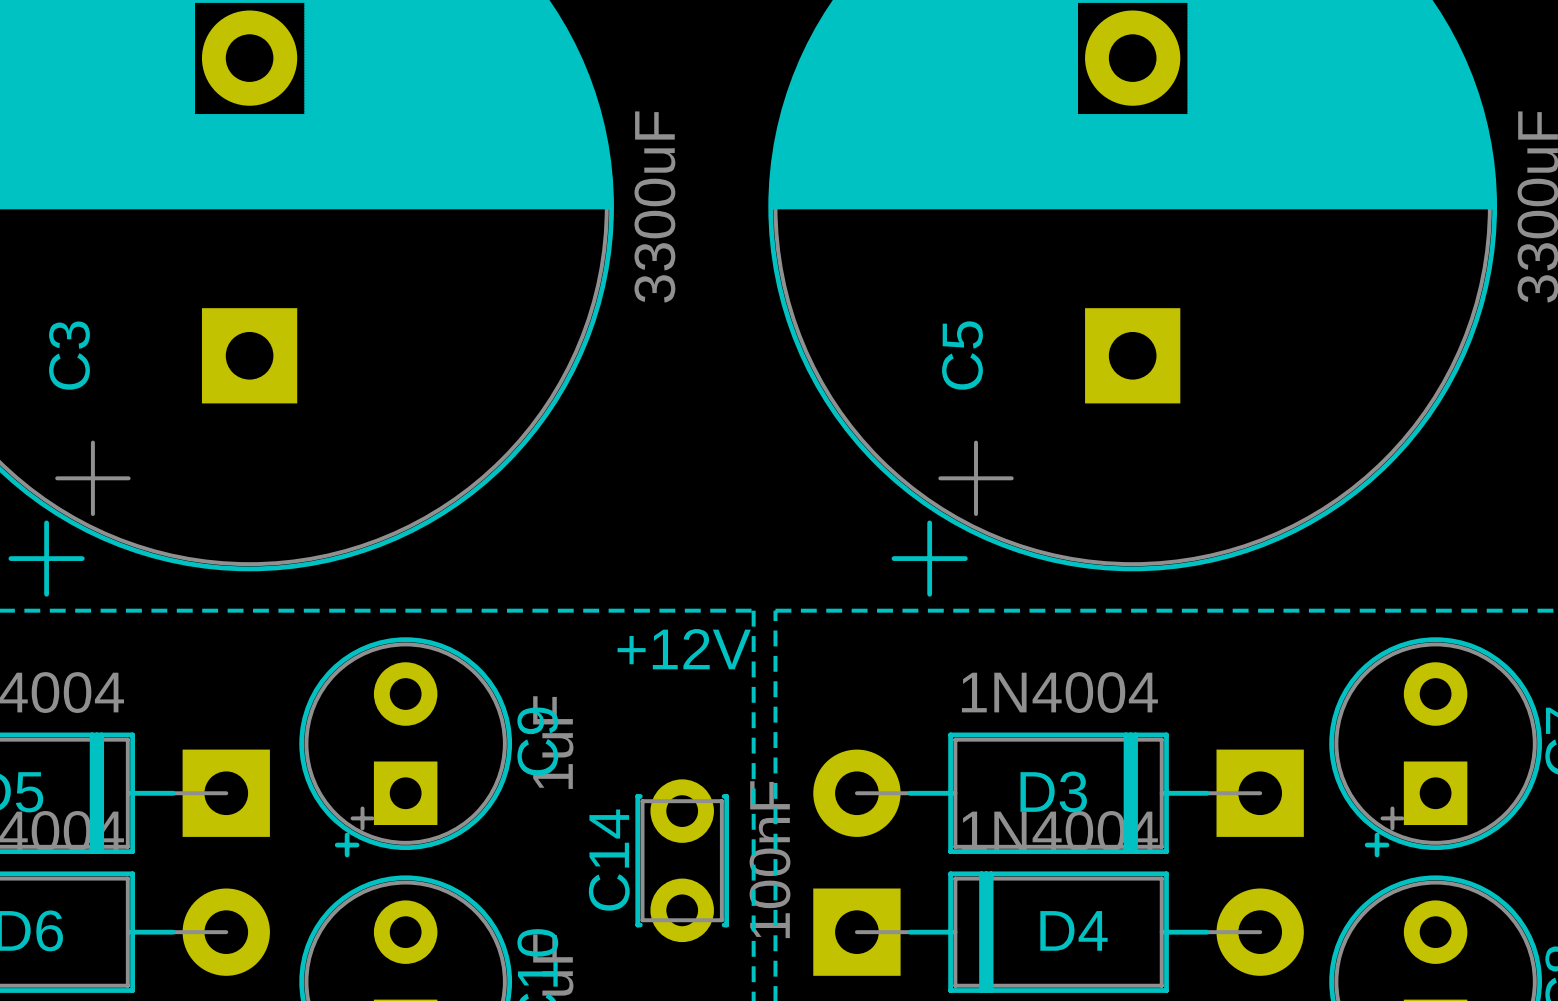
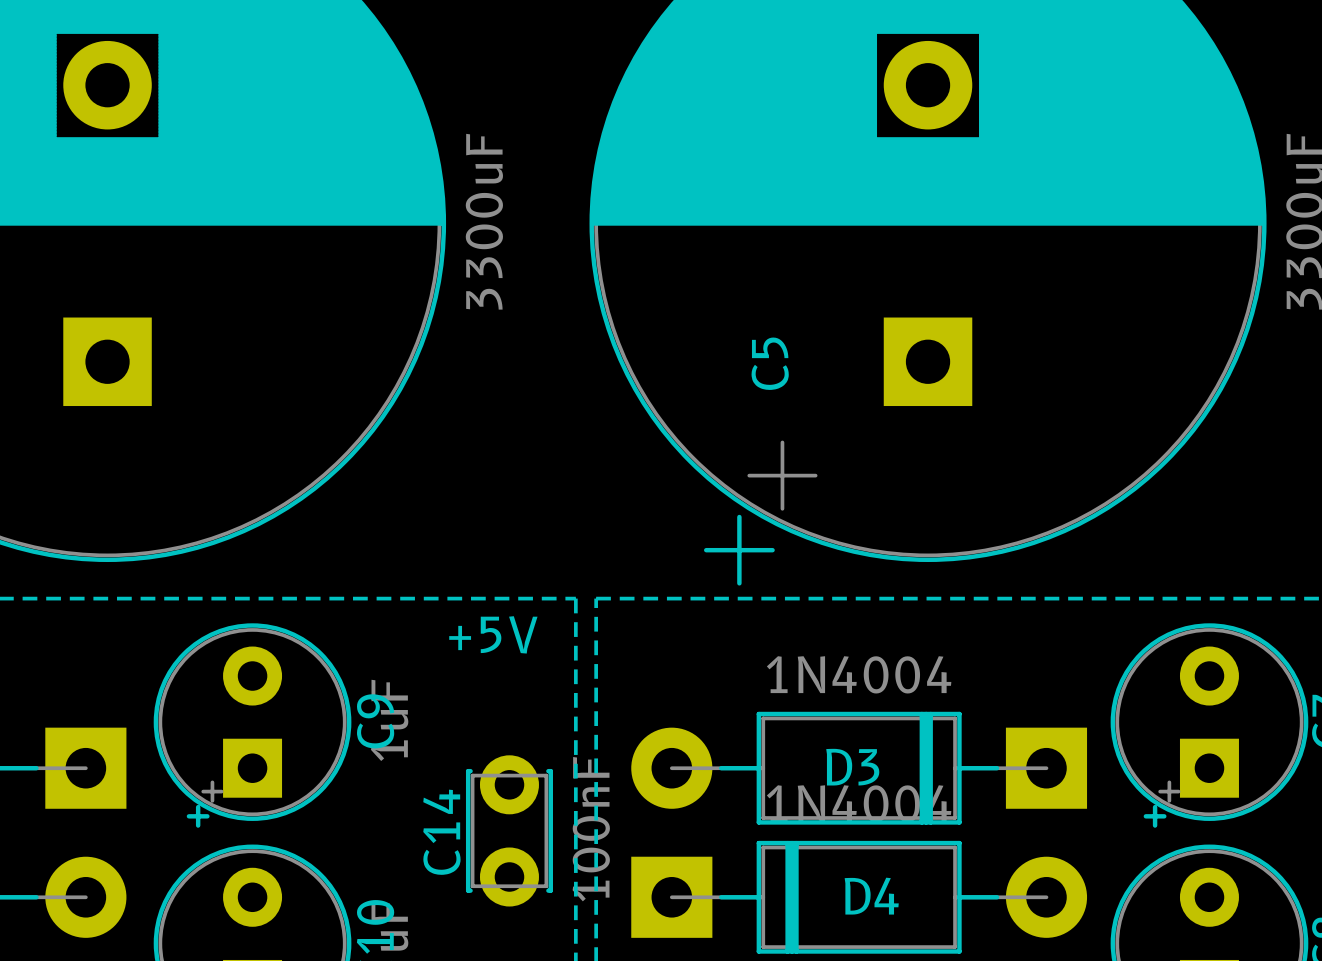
text: +12V (684, 649) -> +5V (493, 634)

